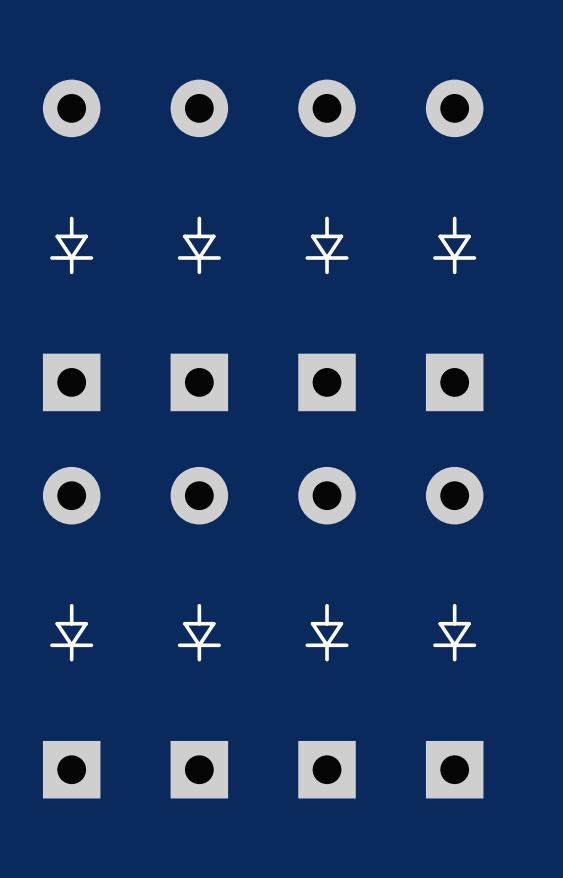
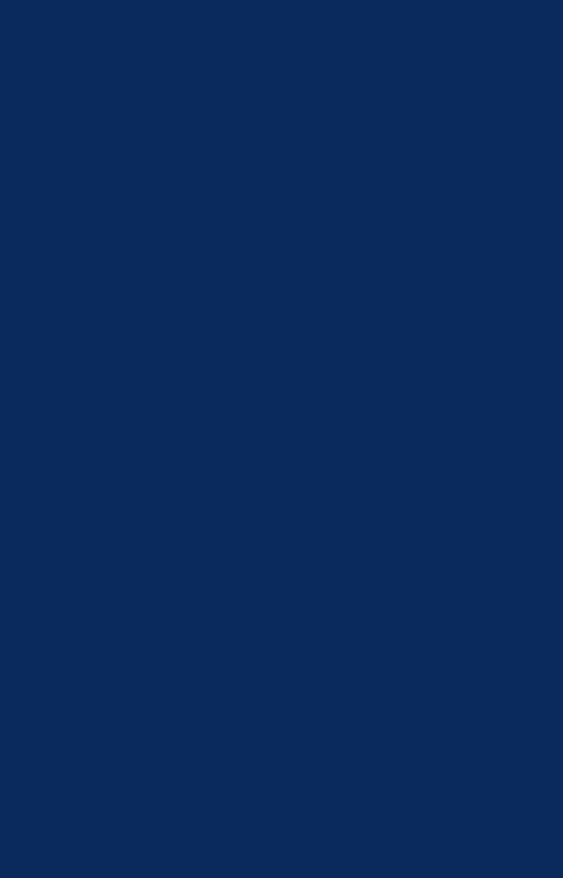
part: (71, 245) -> none
part: (199, 245) -> none
part: (327, 245) -> none
part: (454, 245) -> none
part: (71, 632) -> none
part: (199, 632) -> none
part: (327, 632) -> none
part: (454, 632) -> none

